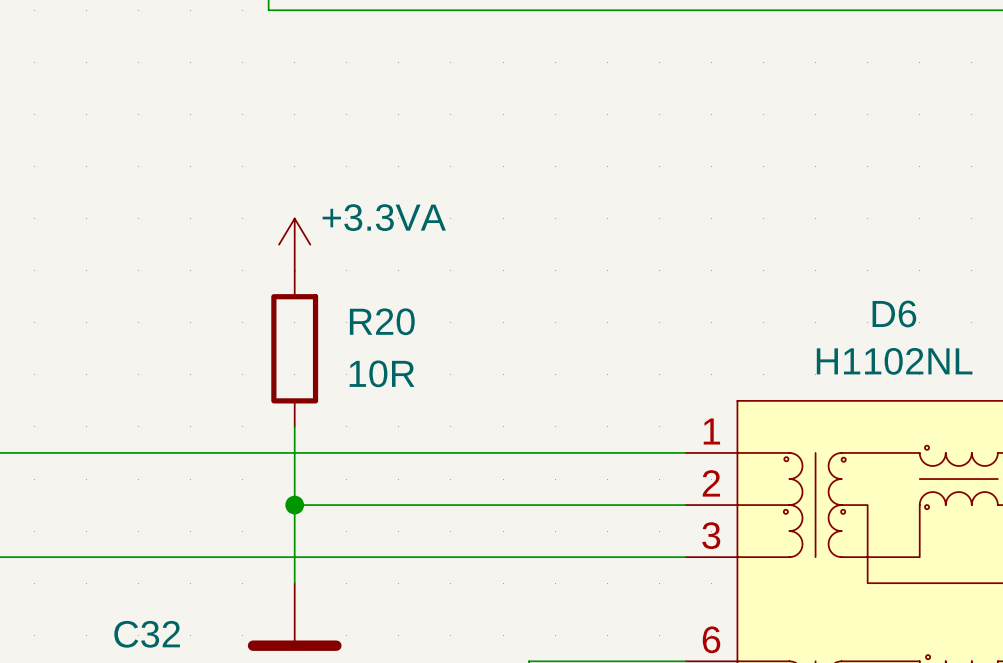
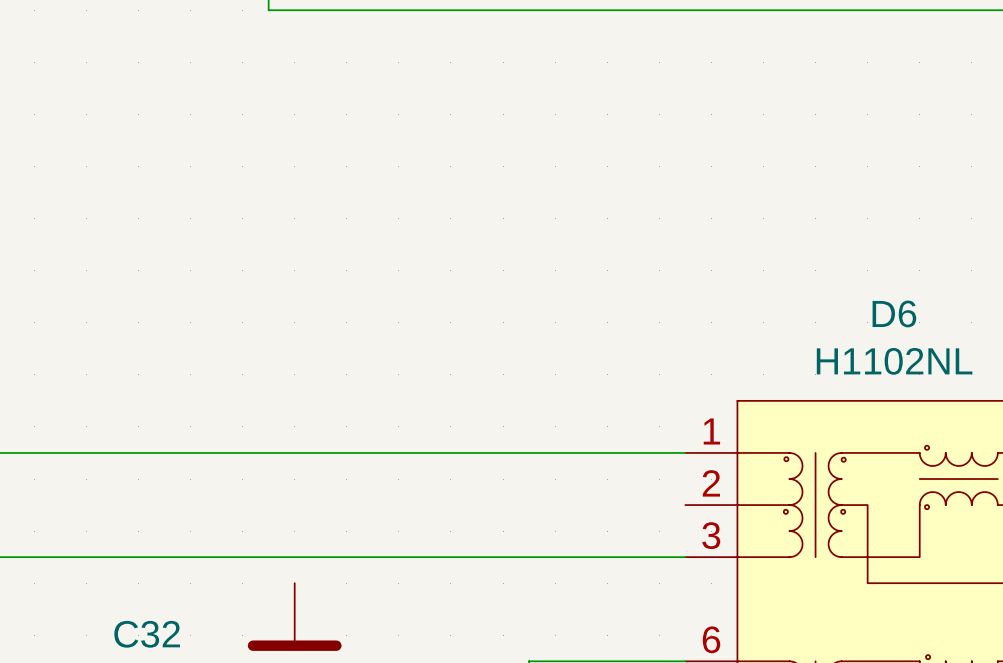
power symbol: +3.3VA (294, 244) -> none
R20: 10R (294, 348) -> none
wire: (294, 426) (294, 583) -> none
wire: (294, 505) (685, 505) -> none
junction: (294, 505) -> none

